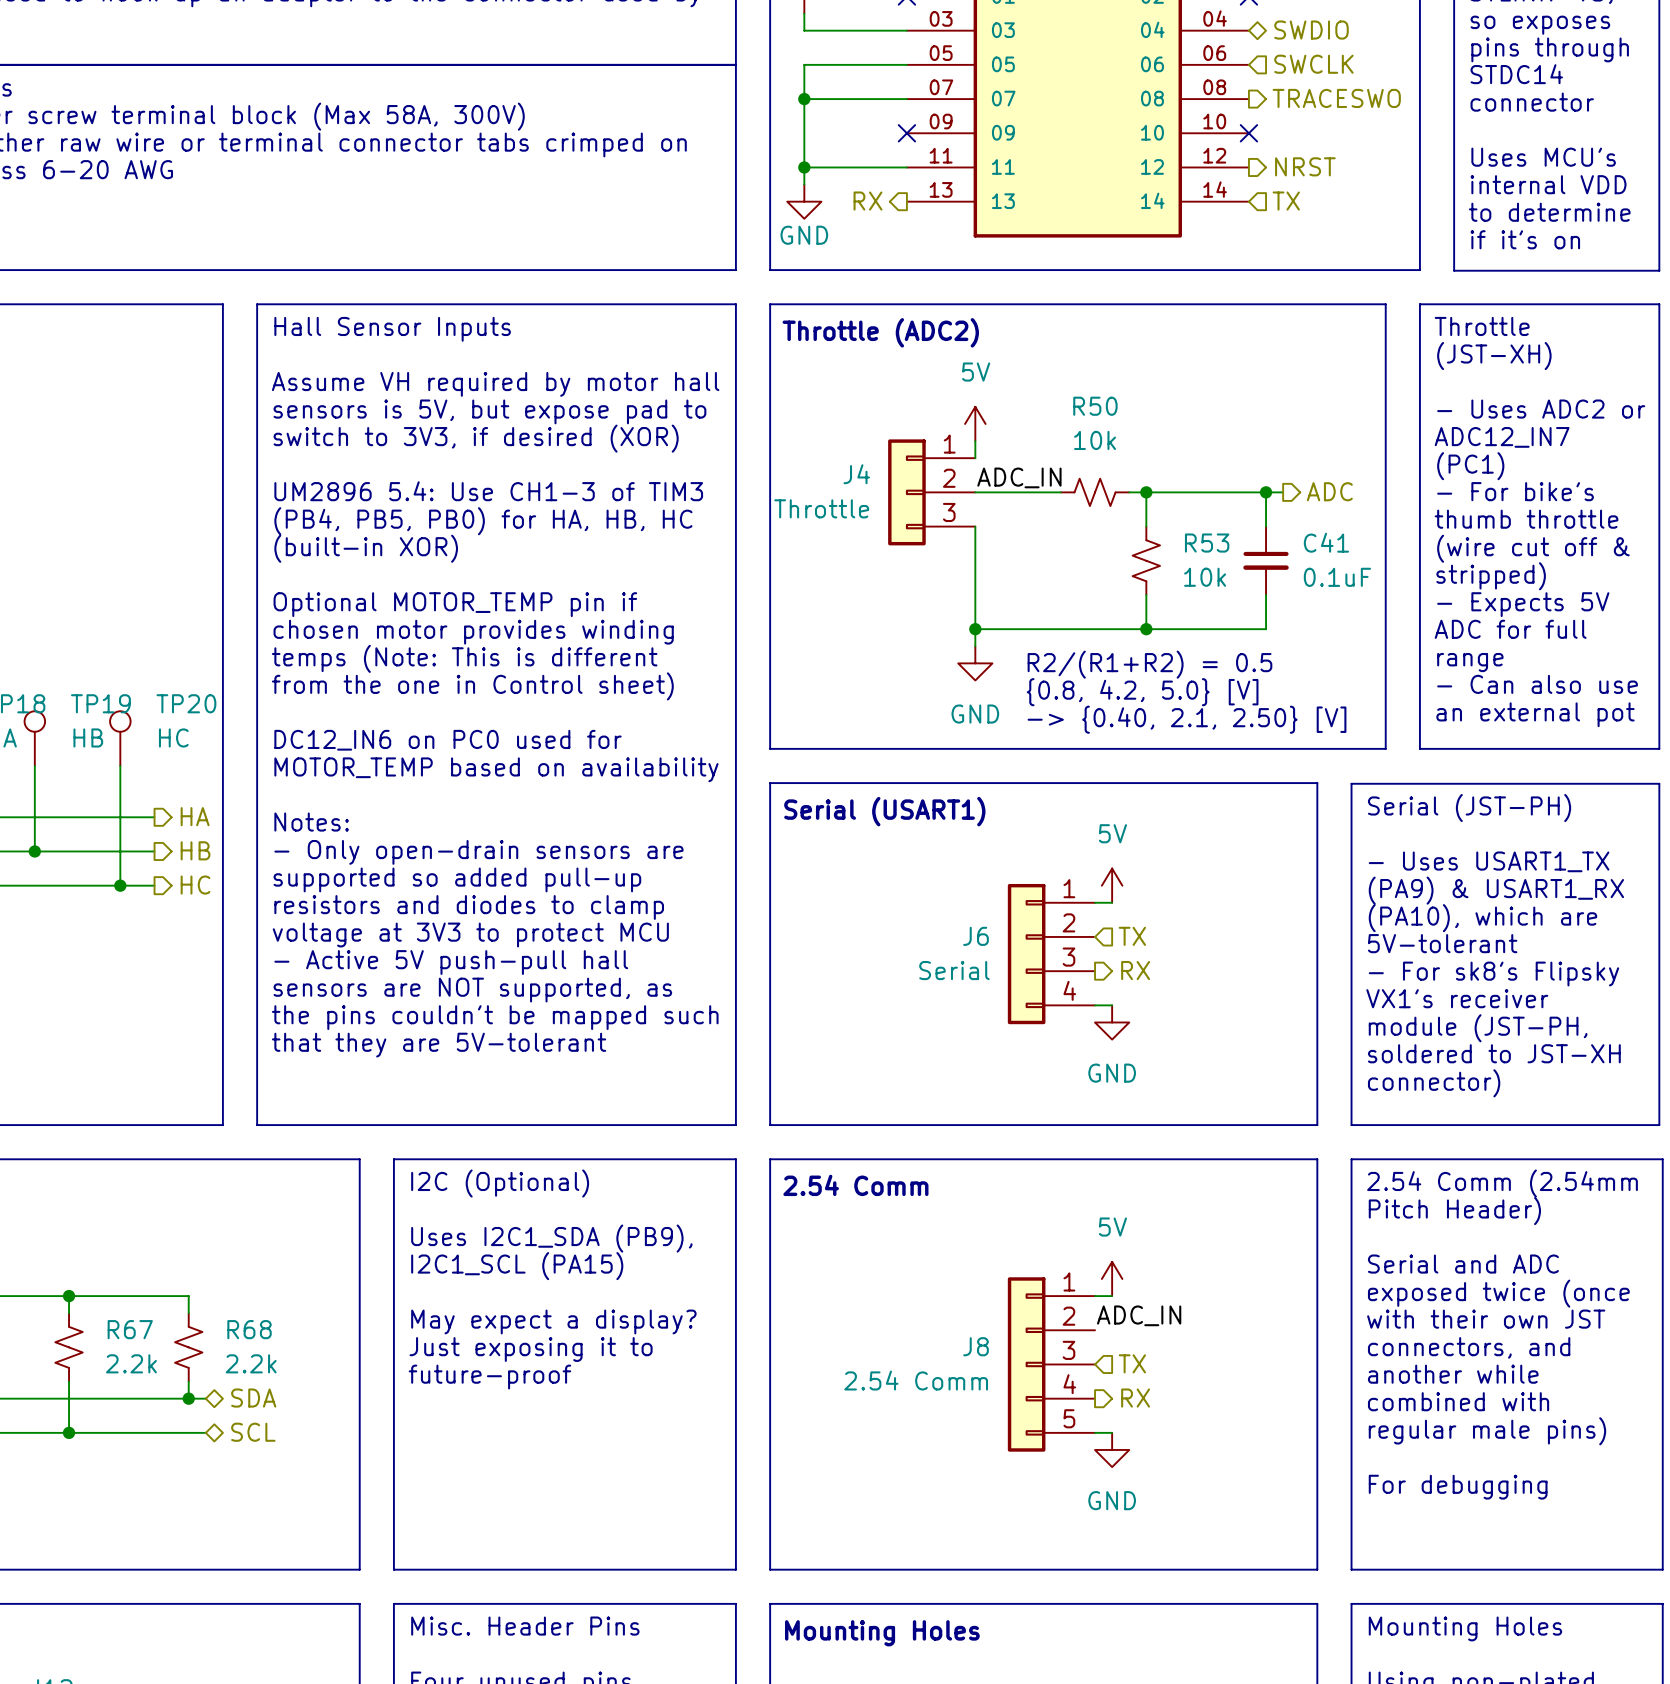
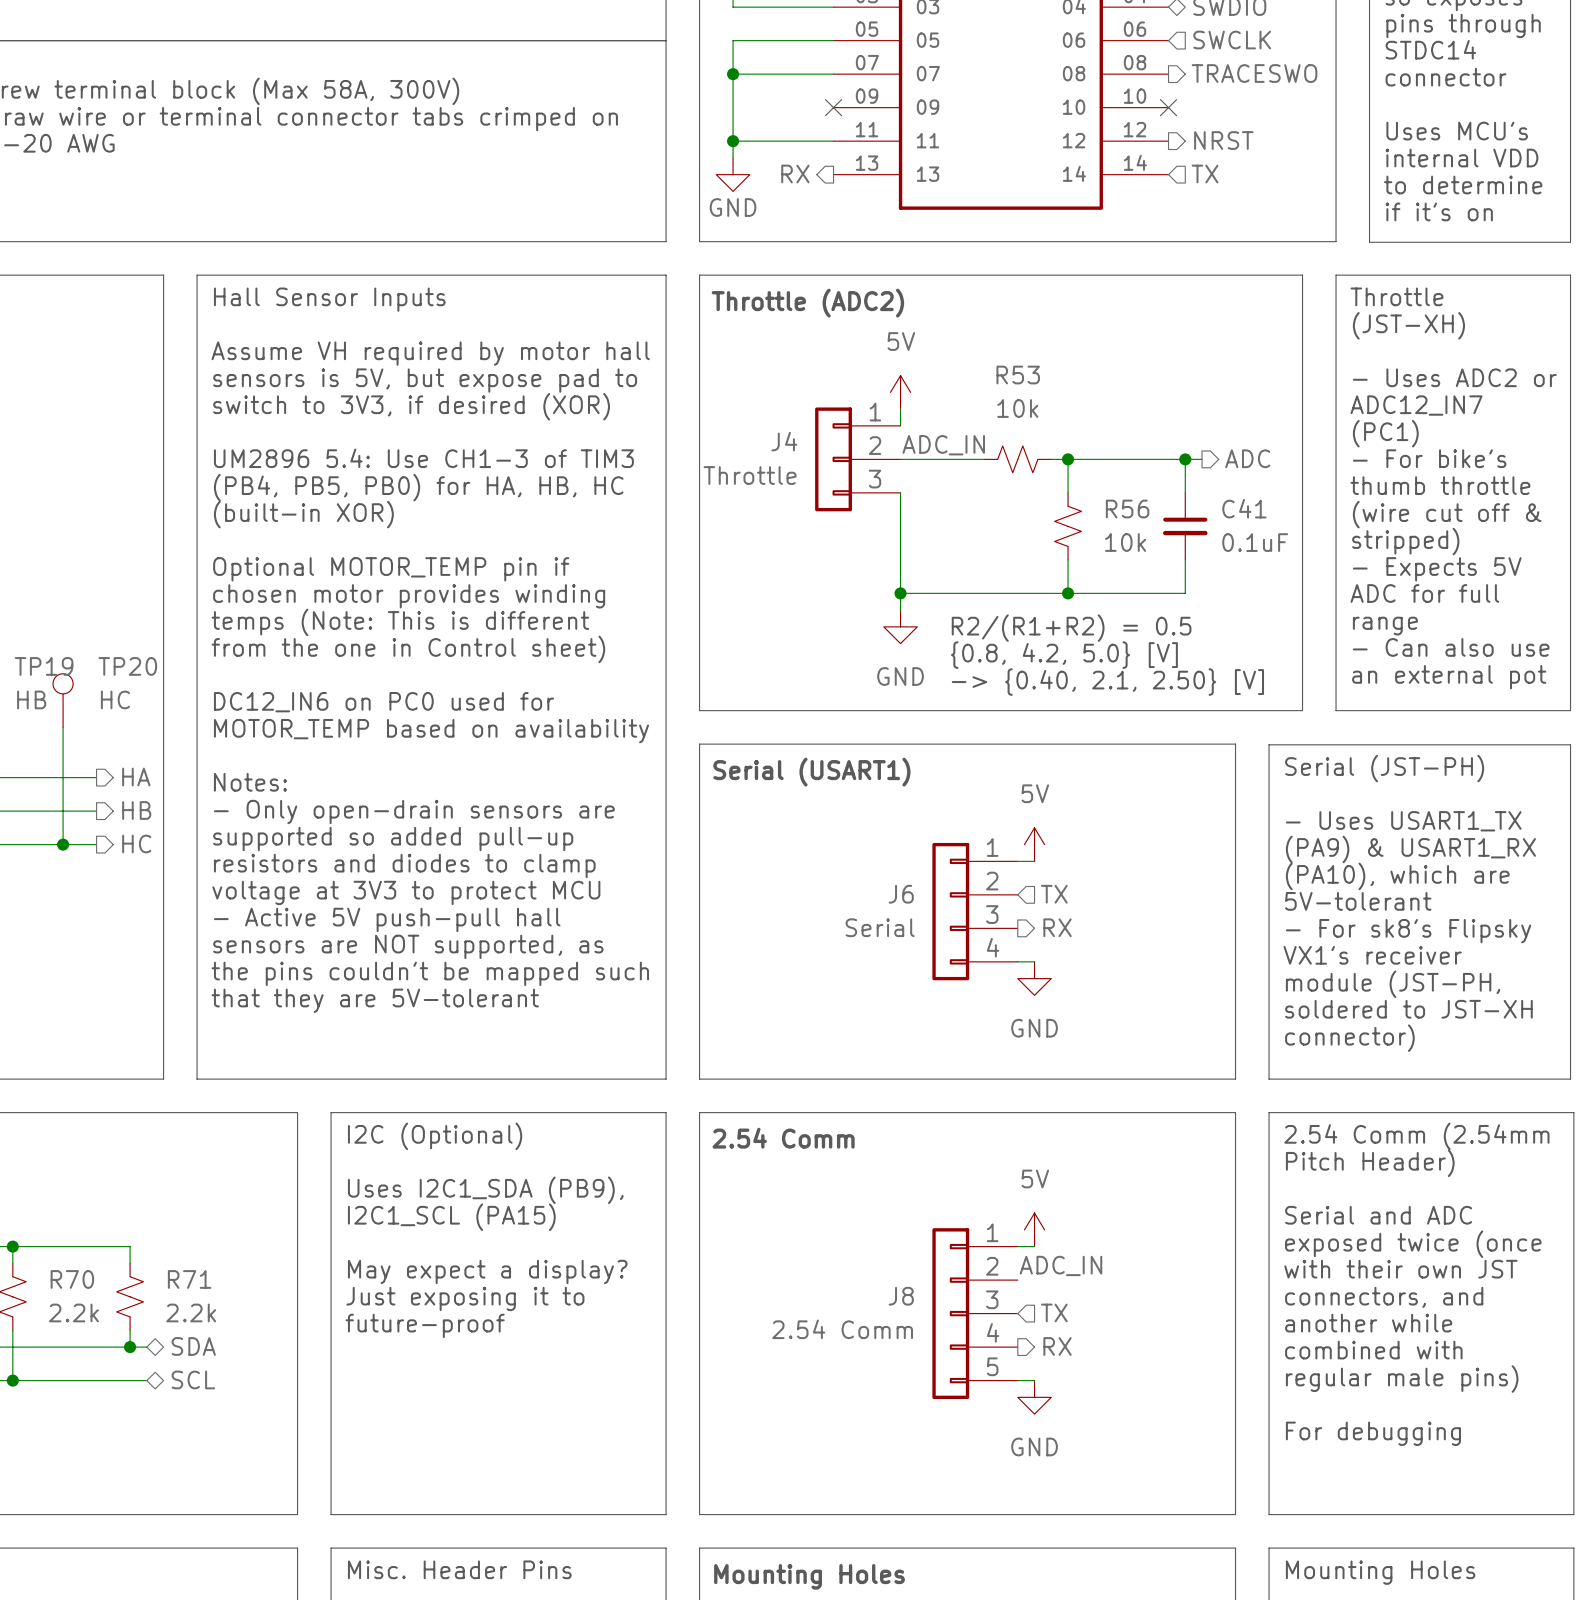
R50 name: R50 (1095, 406) -> R53 (1018, 375)
R53 name: R53 (1207, 543) -> R56 (1127, 509)
R67 name: R67 (130, 1329) -> R70 (72, 1279)
R68 name: R68 (249, 1329) -> R71 (189, 1279)

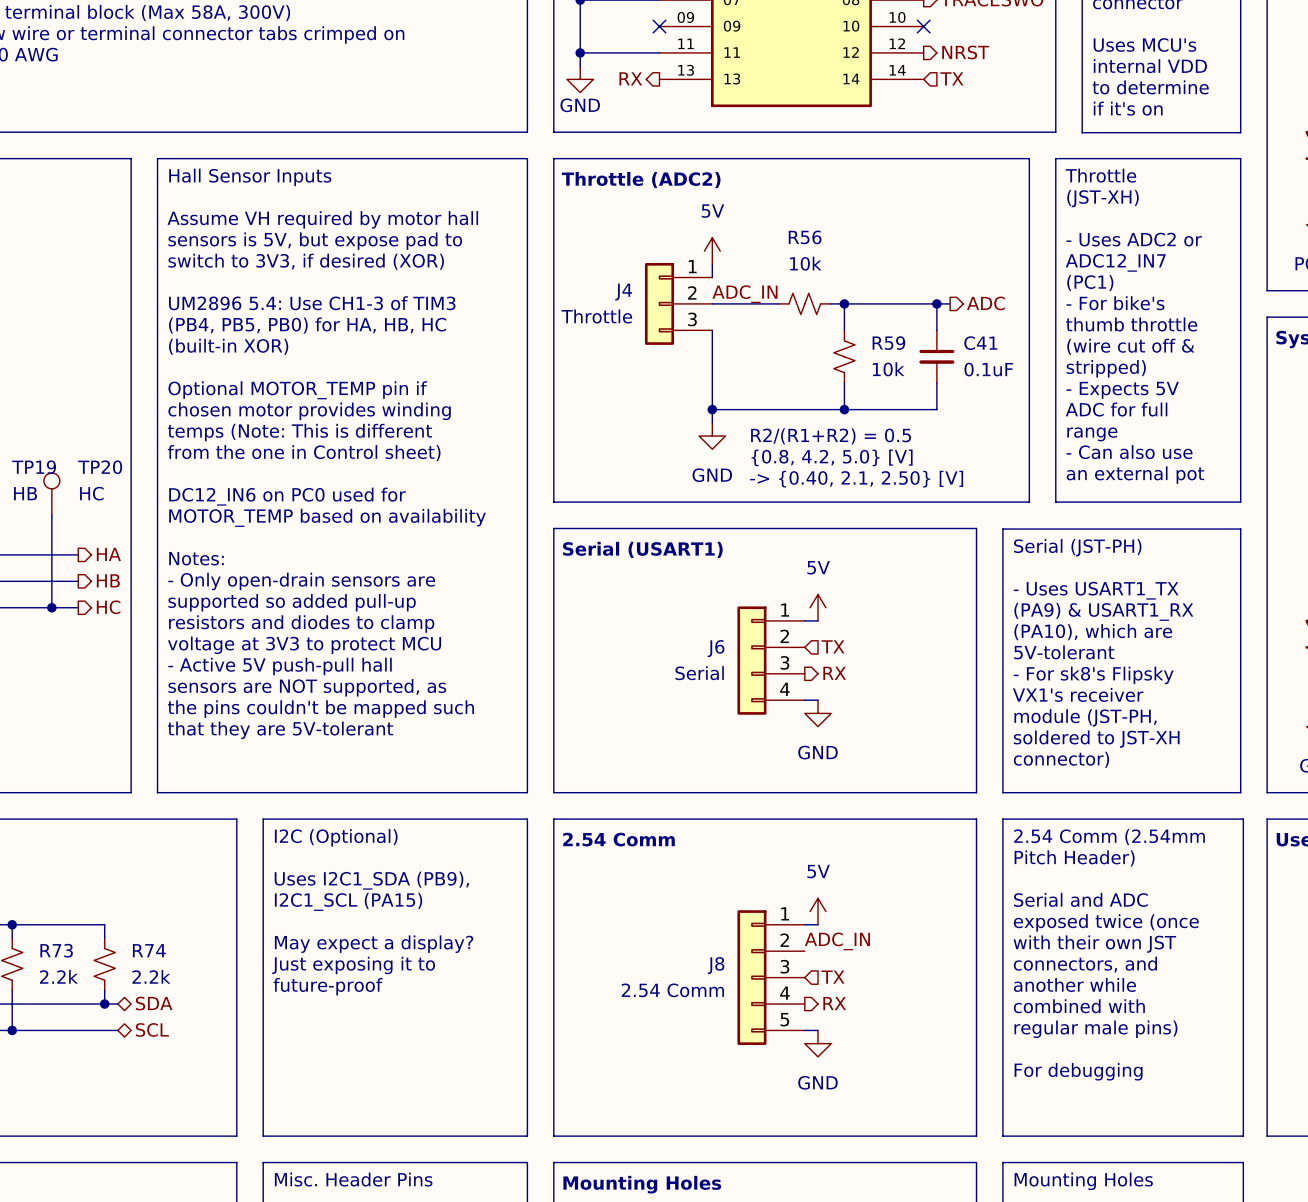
R53 name: R53 (1018, 375) -> R56 (805, 237)
R56 name: R56 (1127, 509) -> R59 (888, 343)
R70 name: R70 (72, 1279) -> R73 (56, 950)
R71 name: R71 (189, 1279) -> R74 (149, 950)

